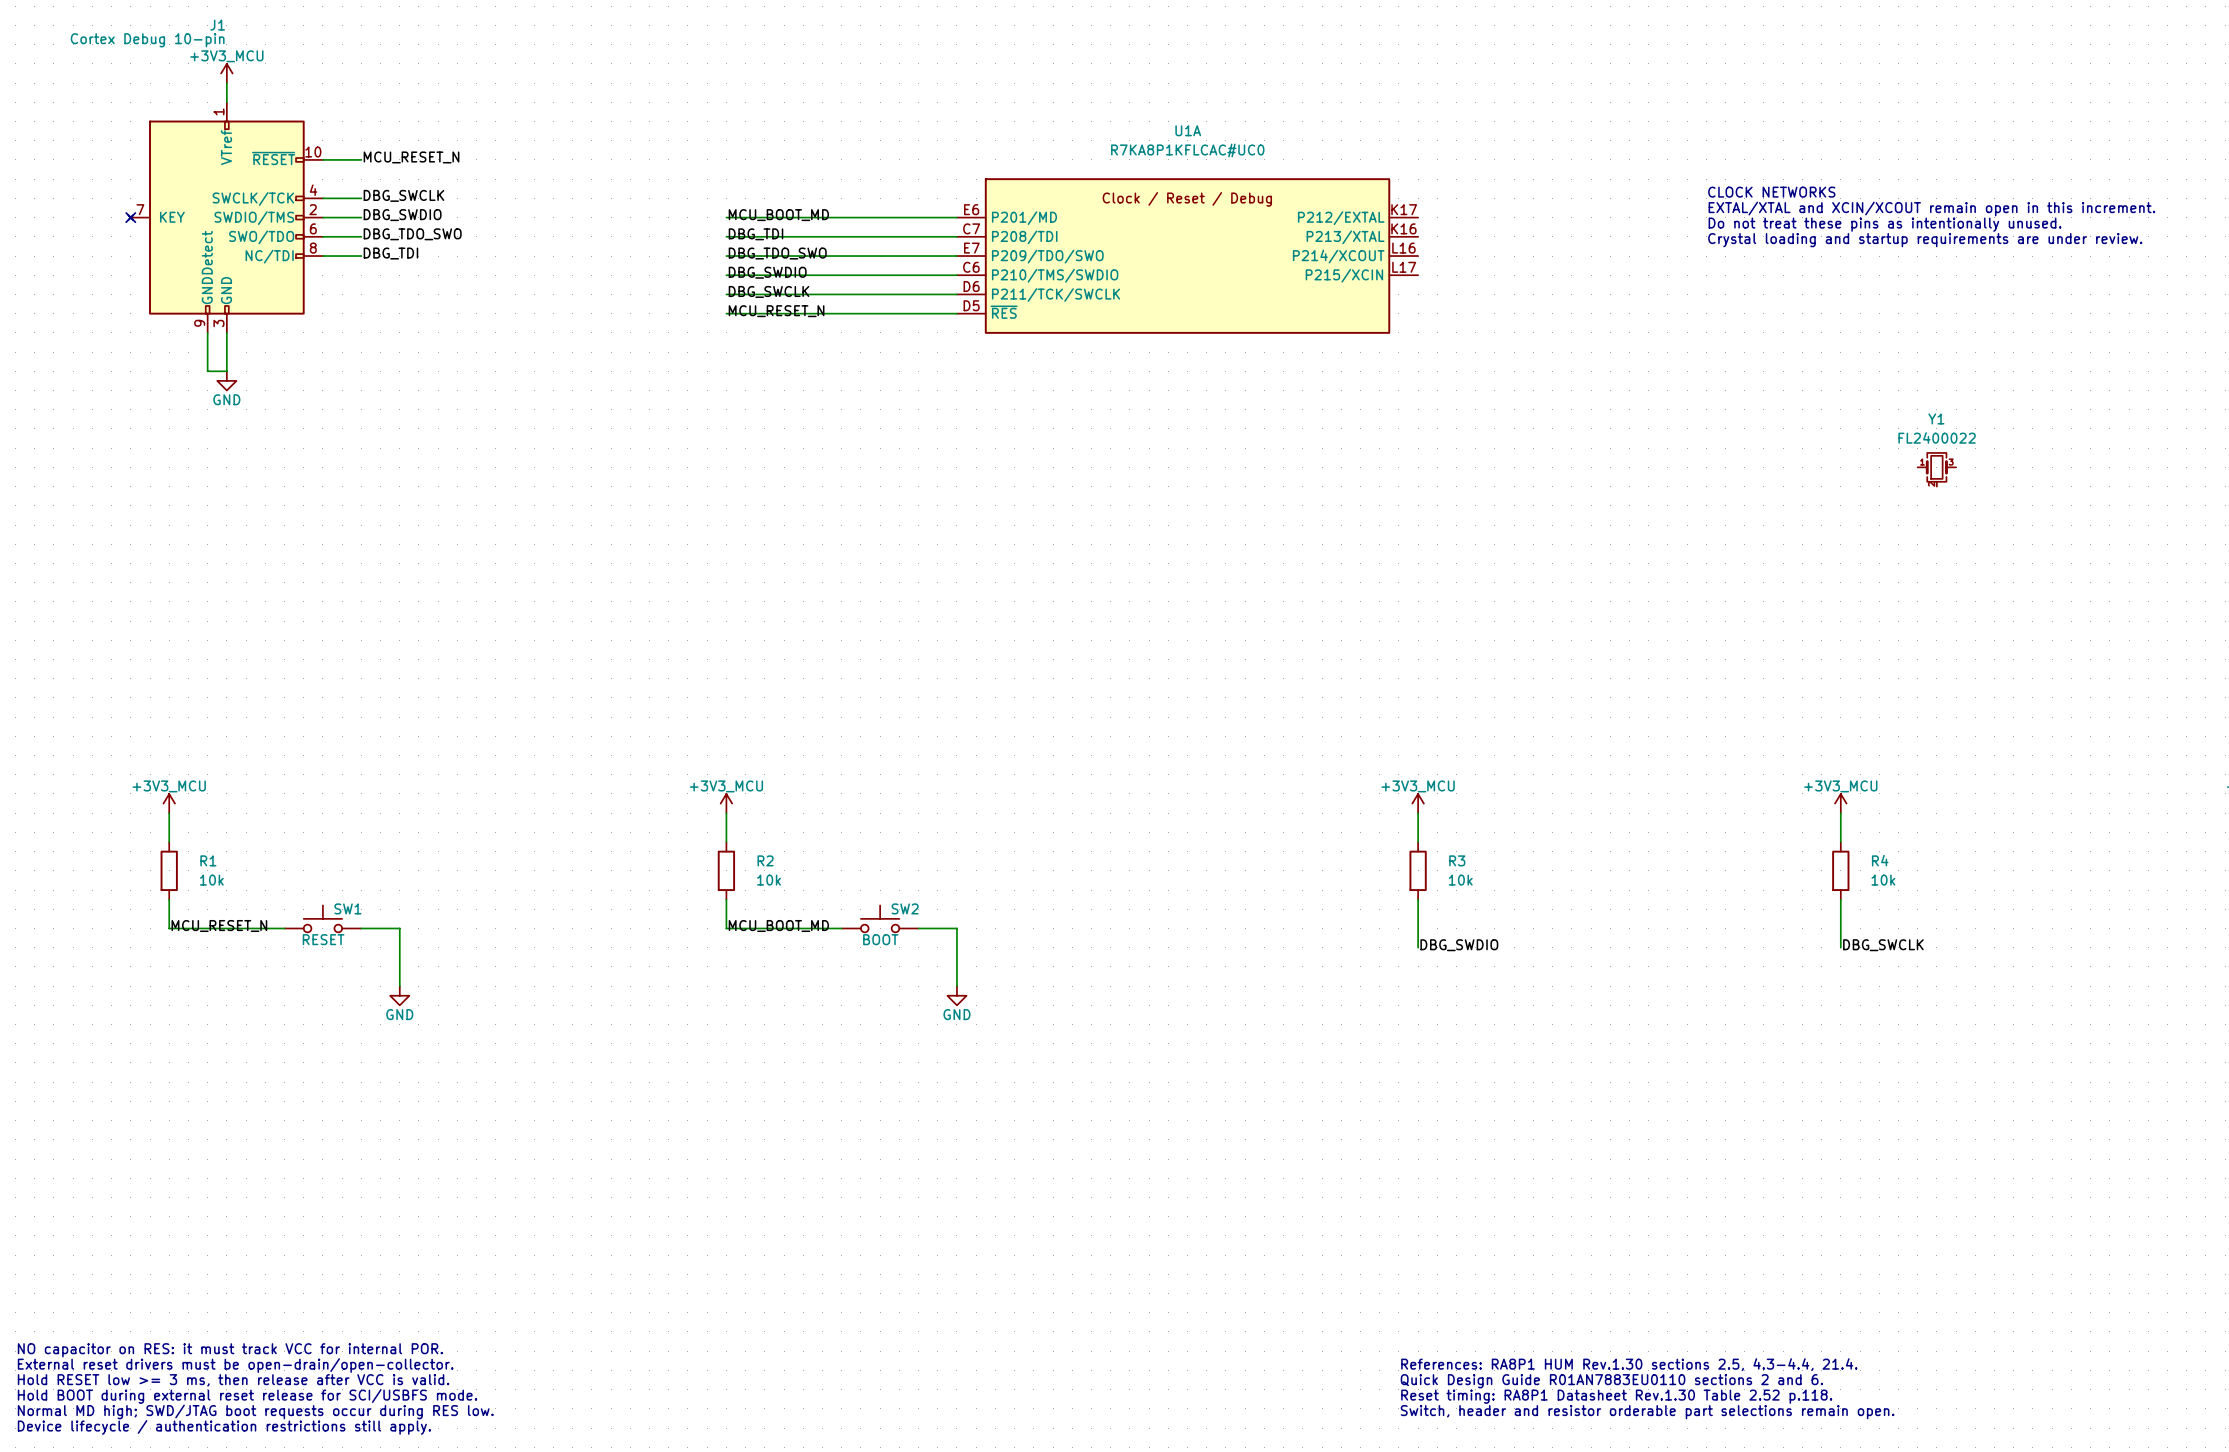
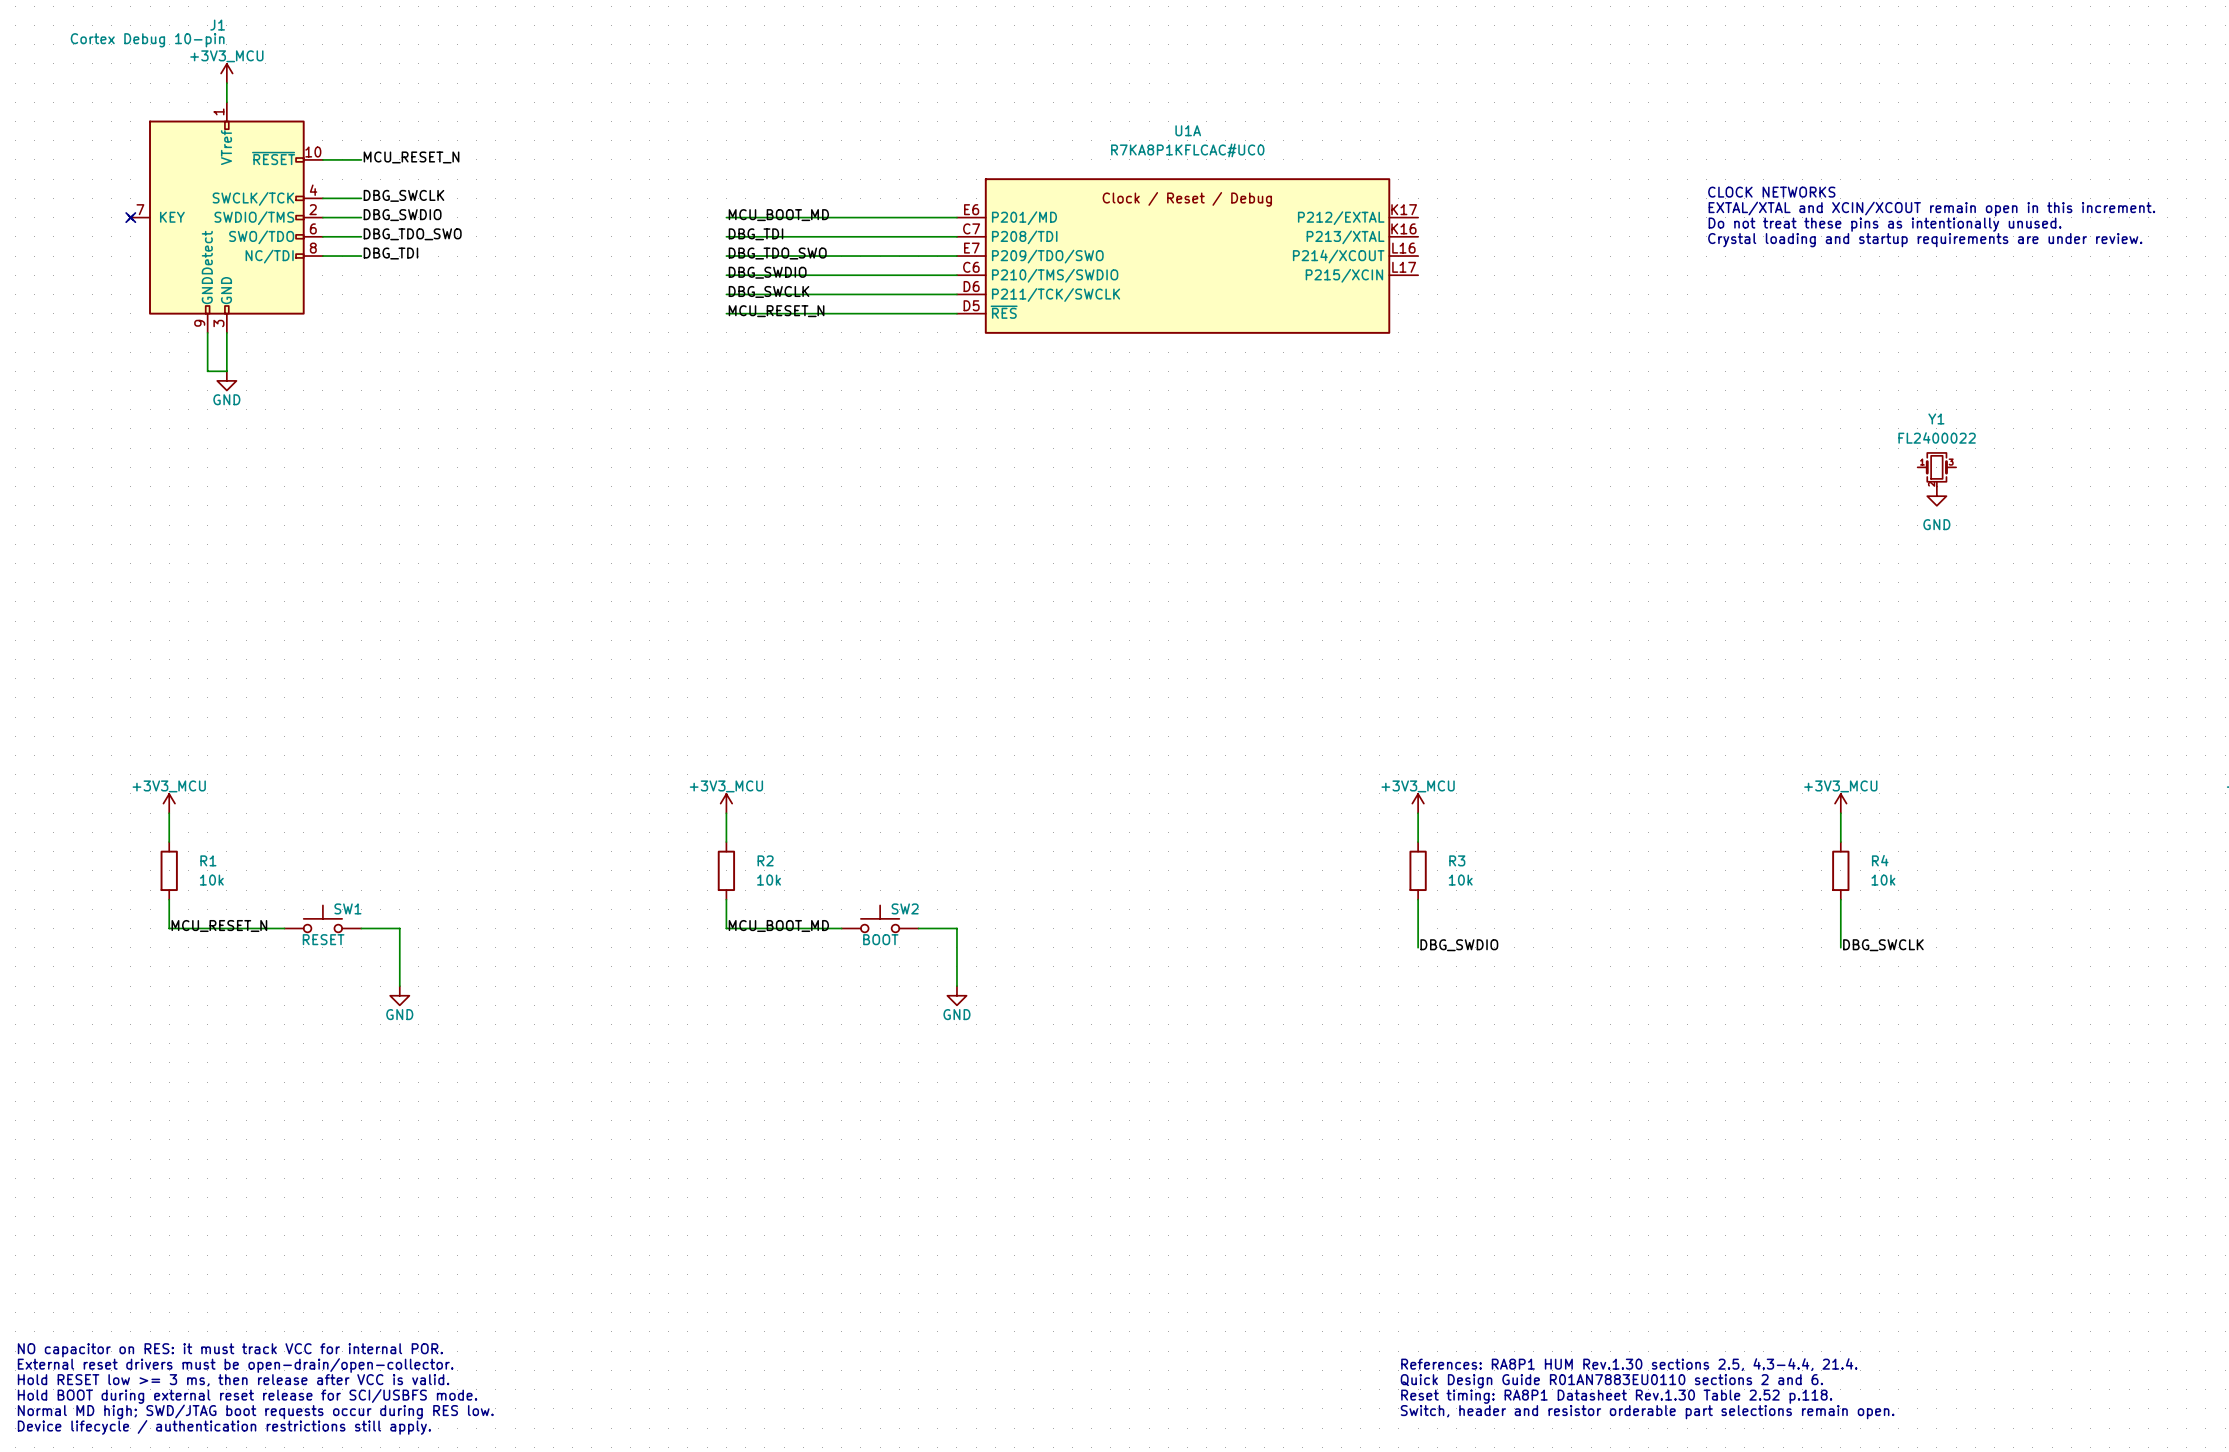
power symbol: none -> GND (1936, 496)

